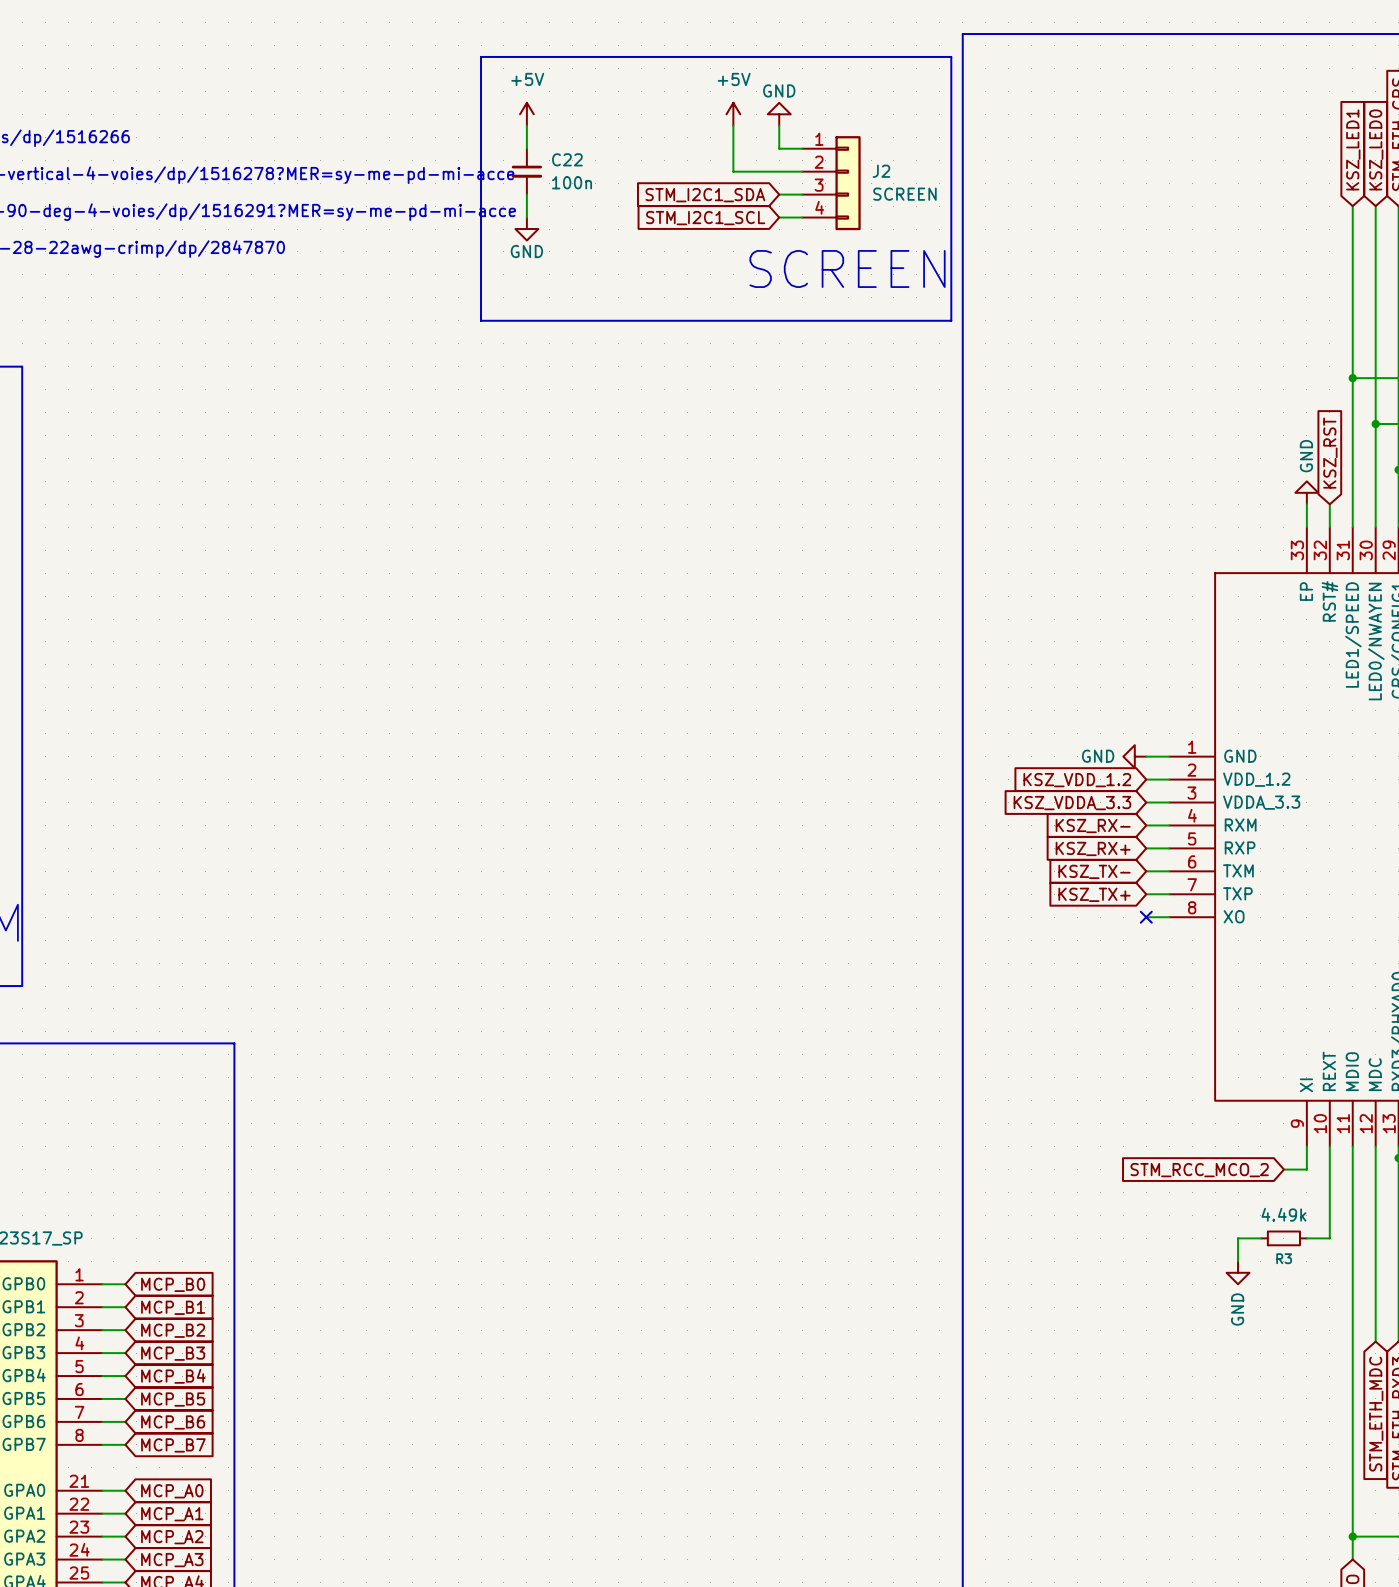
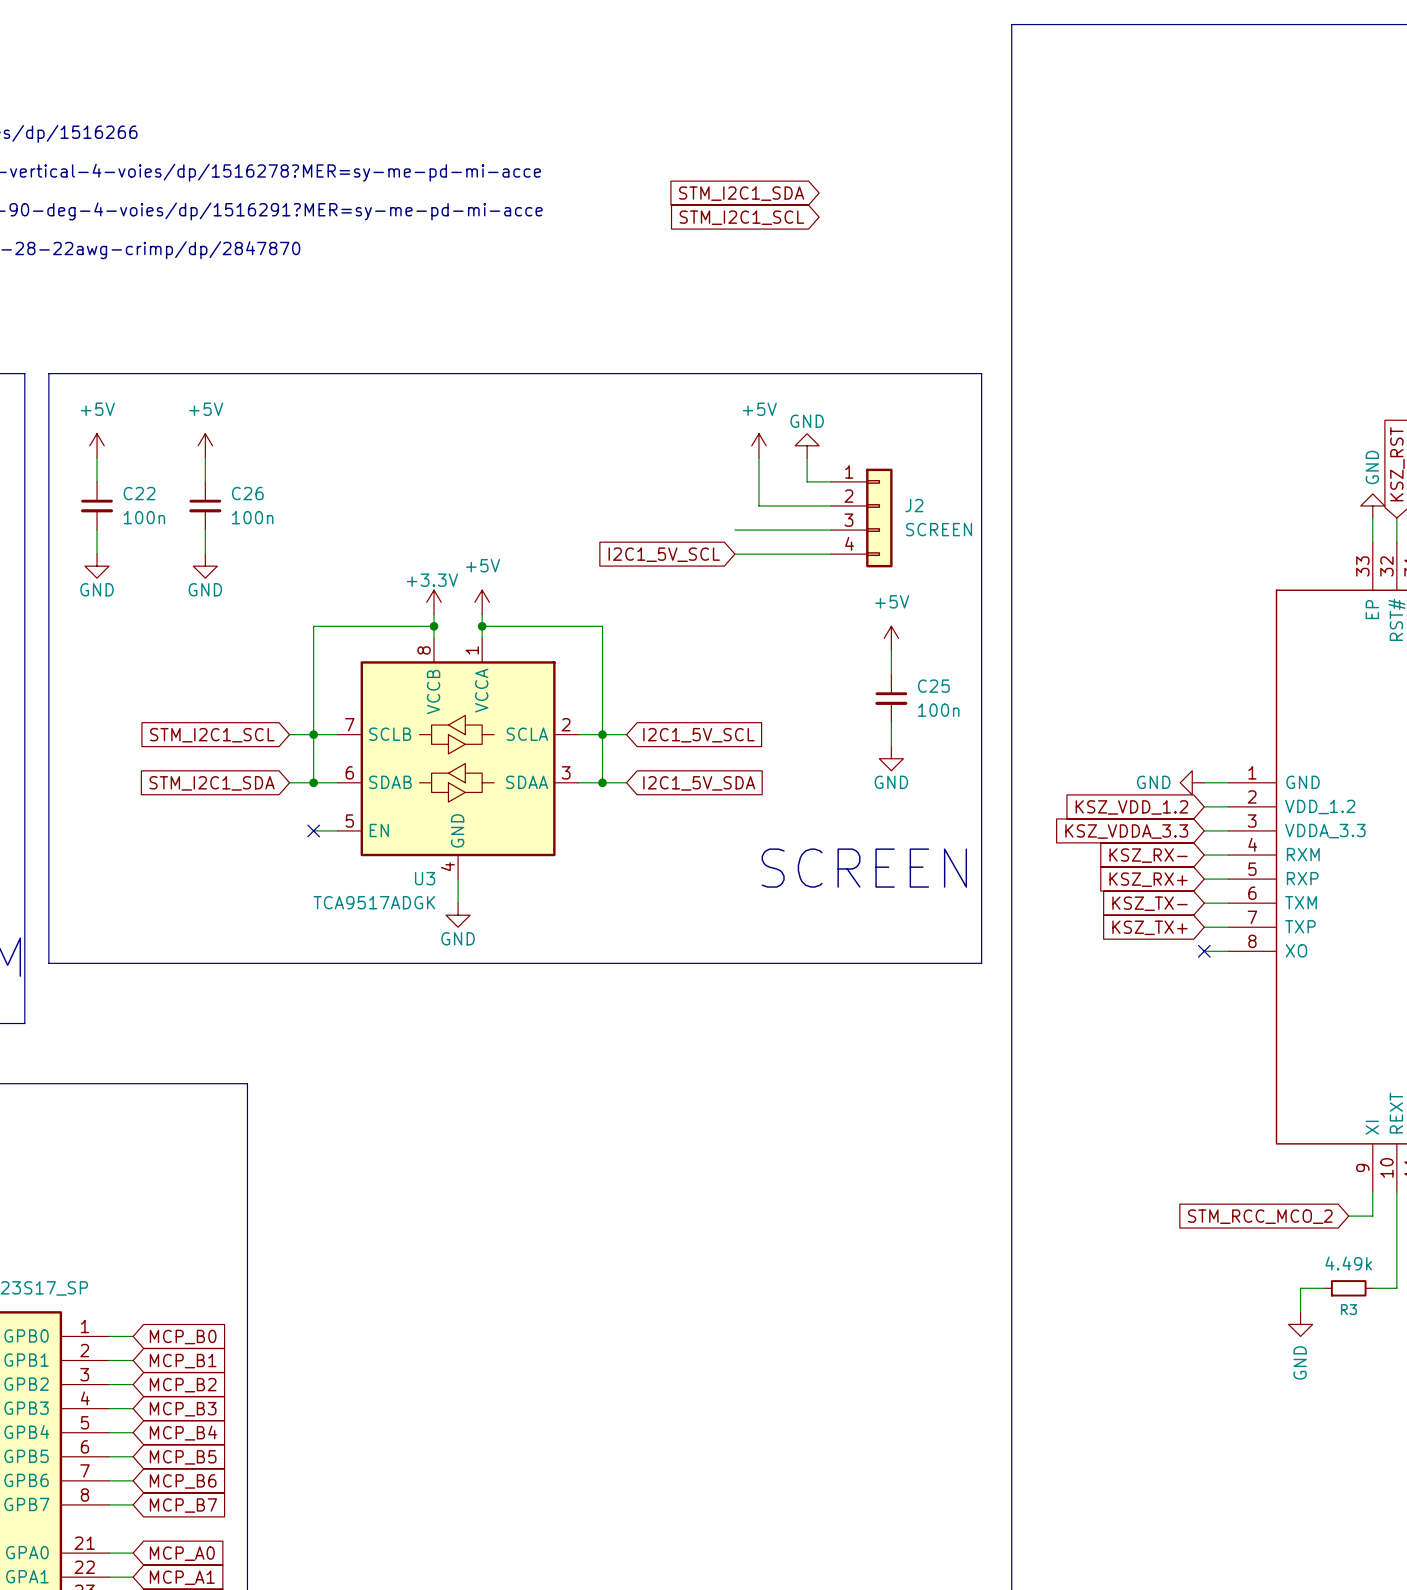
line: (481, 56) (951, 56) (951, 320) (481, 320) (481, 56) -> none
power symbol: +5V (526, 114) -> none
power symbol: +5V (733, 114) -> none
power symbol: GND (779, 114) -> none
wire: (526, 125) (526, 148) -> none
wire: (733, 125) (733, 171) (802, 171) -> none
wire: (779, 125) (779, 148) (802, 148) -> none
C22 position: (526, 171) -> (97, 505)
J2 position: (831, 183) -> (861, 518)
wire: (526, 194) (526, 217) -> none
wire: (779, 194) (802, 194) -> none
wire: (779, 217) (802, 217) -> none
power symbol: GND (526, 229) -> none
text: SCREEN (847, 268) -> none
line: none -> (48, 373) (981, 373) (981, 963) (48, 963) (48, 373)
power symbol: none -> +5V (97, 445)
power symbol: none -> +5V (205, 445)
power symbol: none -> +5V (758, 445)
power symbol: none -> GND (807, 445)
wire: none -> (97, 457) (97, 481)
wire: none -> (205, 457) (205, 481)
wire: none -> (758, 457) (758, 505) (831, 505)
wire: none -> (807, 457) (807, 481) (831, 481)
C26: none -> 100n (205, 505)
wire: none -> (97, 530) (97, 554)
wire: none -> (205, 530) (205, 554)
wire: none -> (734, 530) (831, 530)
wire: none -> (734, 554) (831, 554)
global label: none -> I2C1_5V_SCL (664, 554)
power symbol: none -> GND (97, 566)
power symbol: none -> GND (205, 566)
power symbol: none -> +3.3V (434, 602)
power symbol: none -> +5V (482, 602)
wire: none -> (434, 614) (434, 638)
wire: none -> (482, 614) (482, 638)
wire: none -> (434, 626) (313, 626) (313, 782)
junction: none -> (434, 626)
wire: none -> (482, 626) (602, 626) (602, 782)
junction: none -> (482, 626)
power symbol: none -> +5V (891, 638)
wire: none -> (891, 650) (891, 674)
C25: none -> 100n (891, 698)
wire: none -> (891, 722) (891, 746)
wire: none -> (289, 734) (337, 734)
junction: none -> (313, 734)
wire: none -> (578, 734) (626, 734)
junction: none -> (602, 734)
global label: none -> STM_I2C1_SCL (212, 735)
global label: none -> I2C1_5V_SCL (698, 735)
U3: none -> TCA9517ADGK (458, 758)
power symbol: none -> GND (891, 758)
wire: none -> (289, 782) (337, 782)
junction: none -> (313, 782)
wire: none -> (578, 782) (626, 782)
junction: none -> (602, 782)
global label: none -> STM_I2C1_SDA (212, 783)
global label: none -> I2C1_5V_SDA (699, 783)
wire: none -> (313, 830) (337, 830)
no-connect mark: none -> (313, 830)
text: none -> SCREEN (864, 868)
wire: none -> (458, 879) (458, 903)
power symbol: none -> GND (458, 915)

